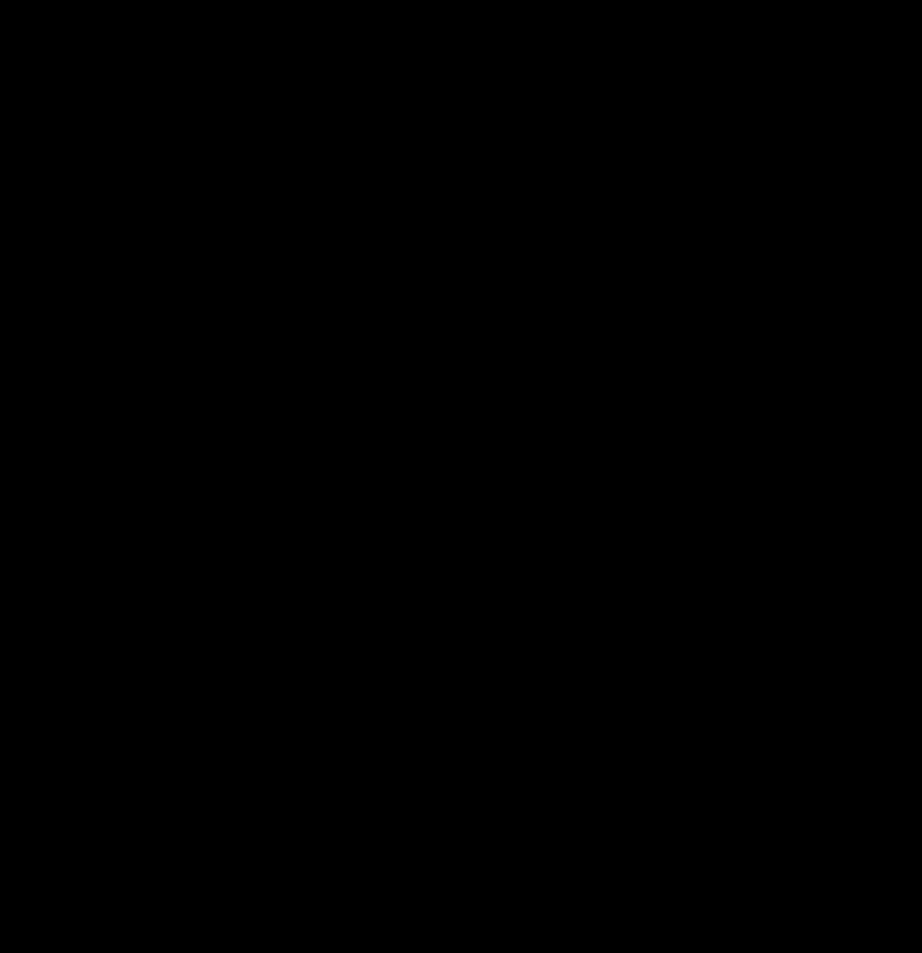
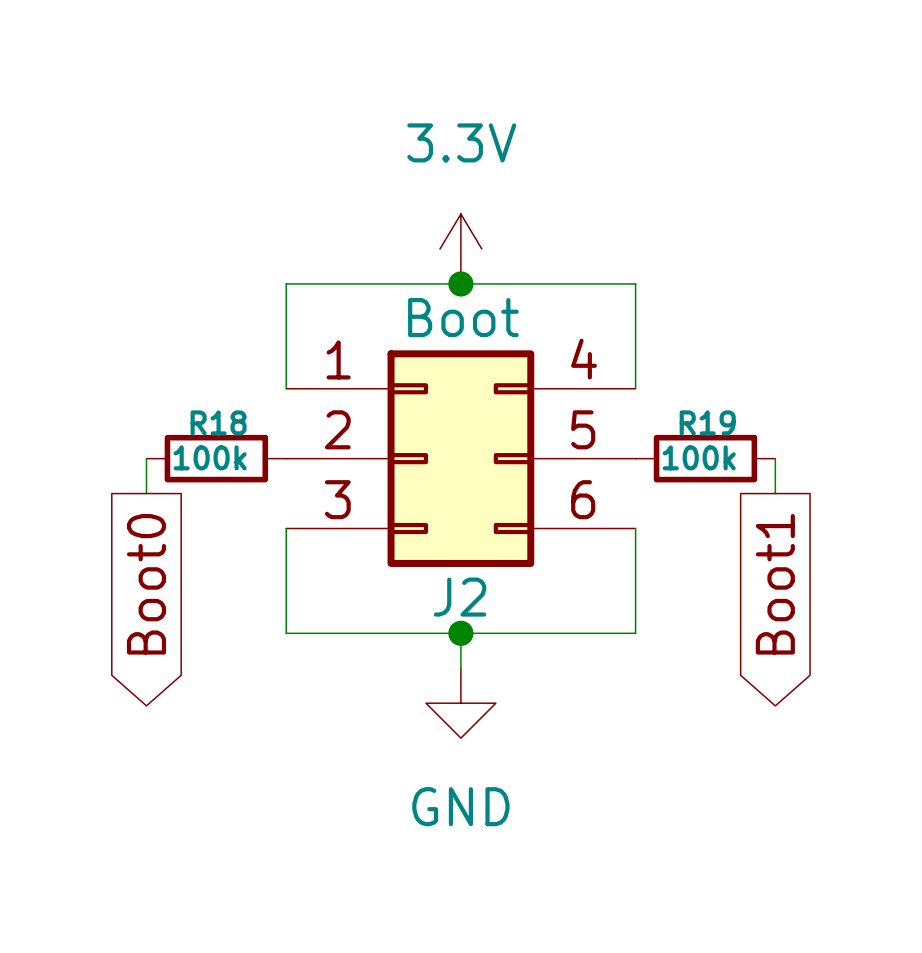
power symbol: none -> 3.3V (460, 249)
junction: none -> (460, 283)
wire: none -> (286, 388) (286, 283) (635, 283) (635, 388)
wire: none -> (146, 458) (146, 493)
R18: none -> 100k (216, 458)
J2: none -> Boot (460, 458)
R19: none -> 100k (705, 458)
wire: none -> (775, 458) (775, 493)
wire: none -> (286, 528) (286, 633) (635, 633) (635, 528)
global label: none -> Boot0 (146, 584)
global label: none -> Boot1 (775, 584)
wire: none -> (460, 633) (460, 668)
junction: none -> (460, 633)
power symbol: none -> GND (460, 703)

